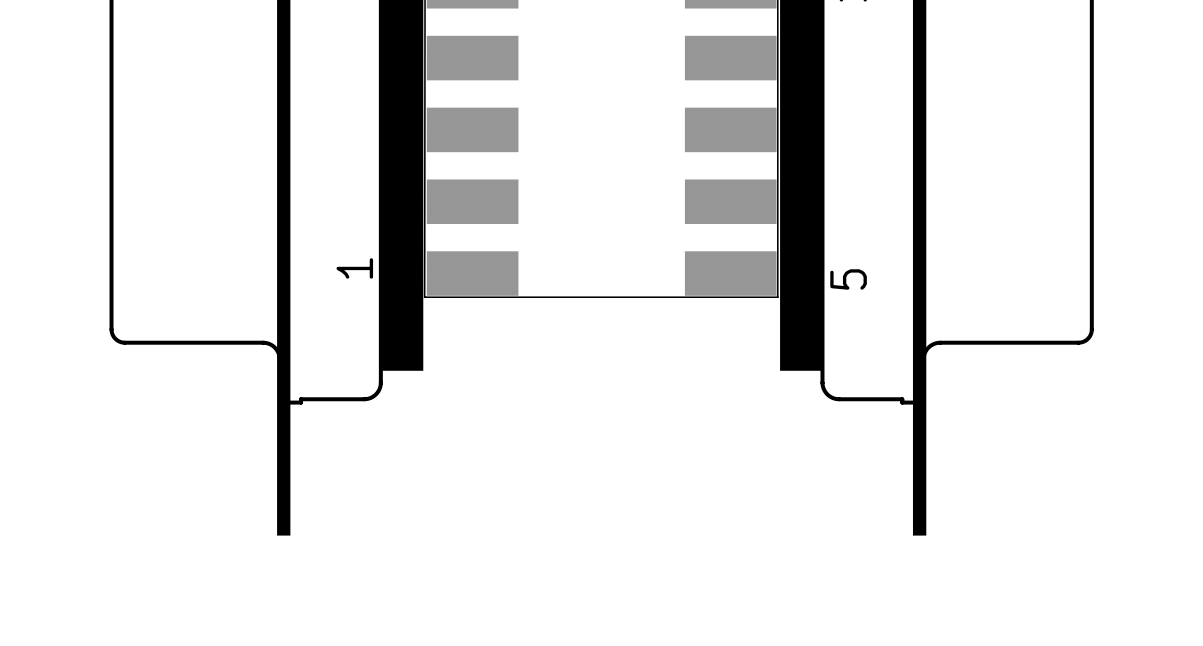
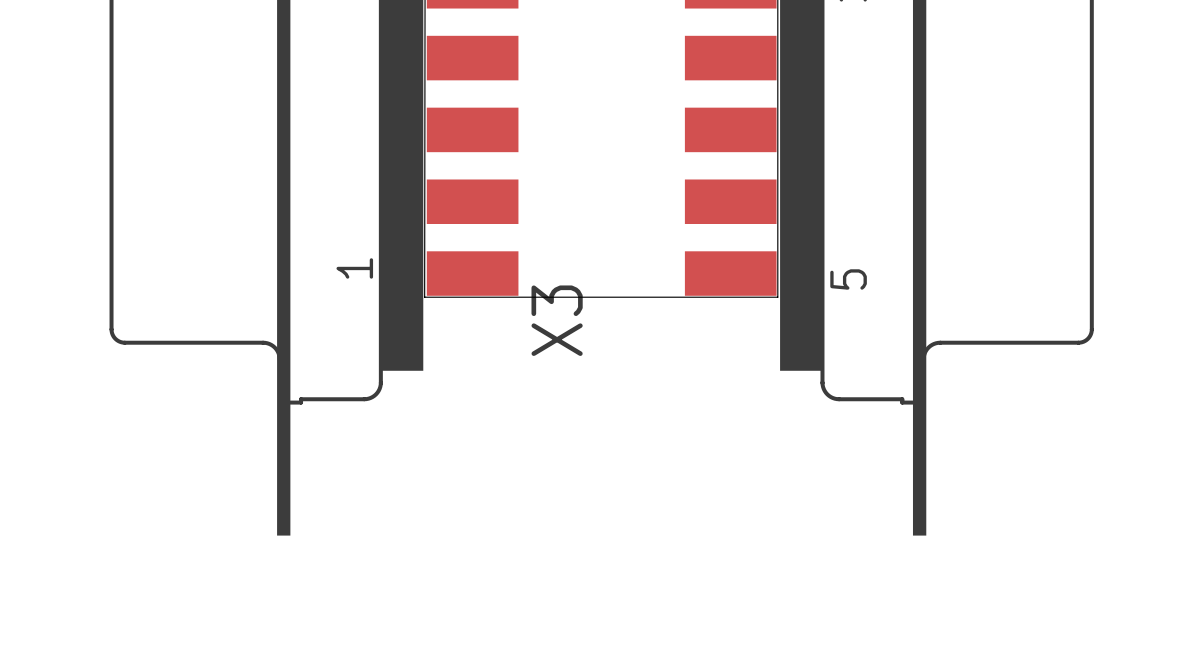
X3 name: none -> X3 (557, 320)

